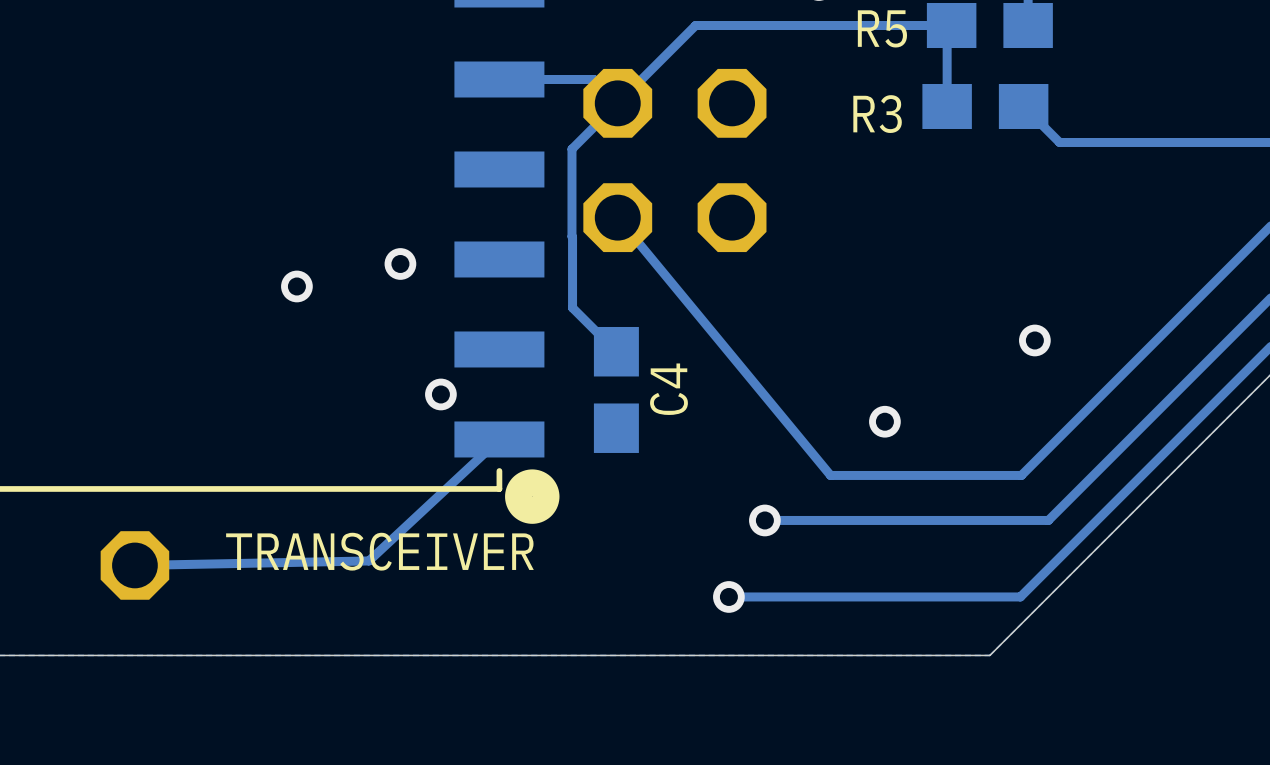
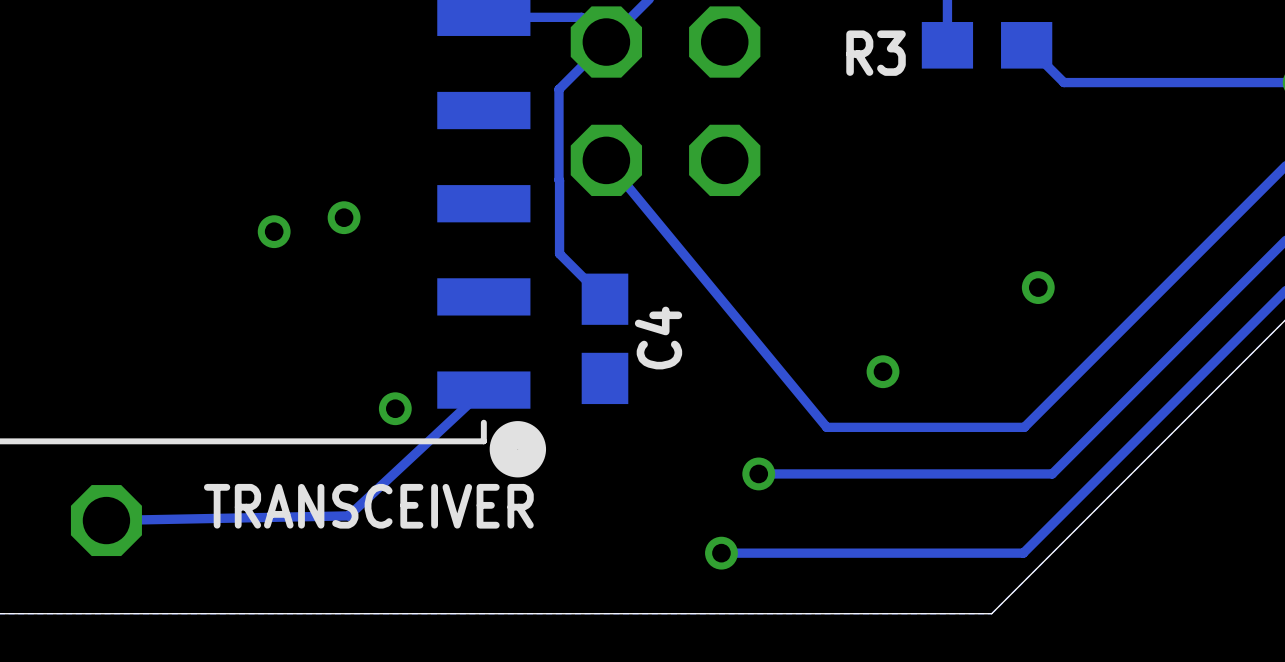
via position: (400, 263) -> (344, 217)
via position: (440, 394) -> (395, 408)

